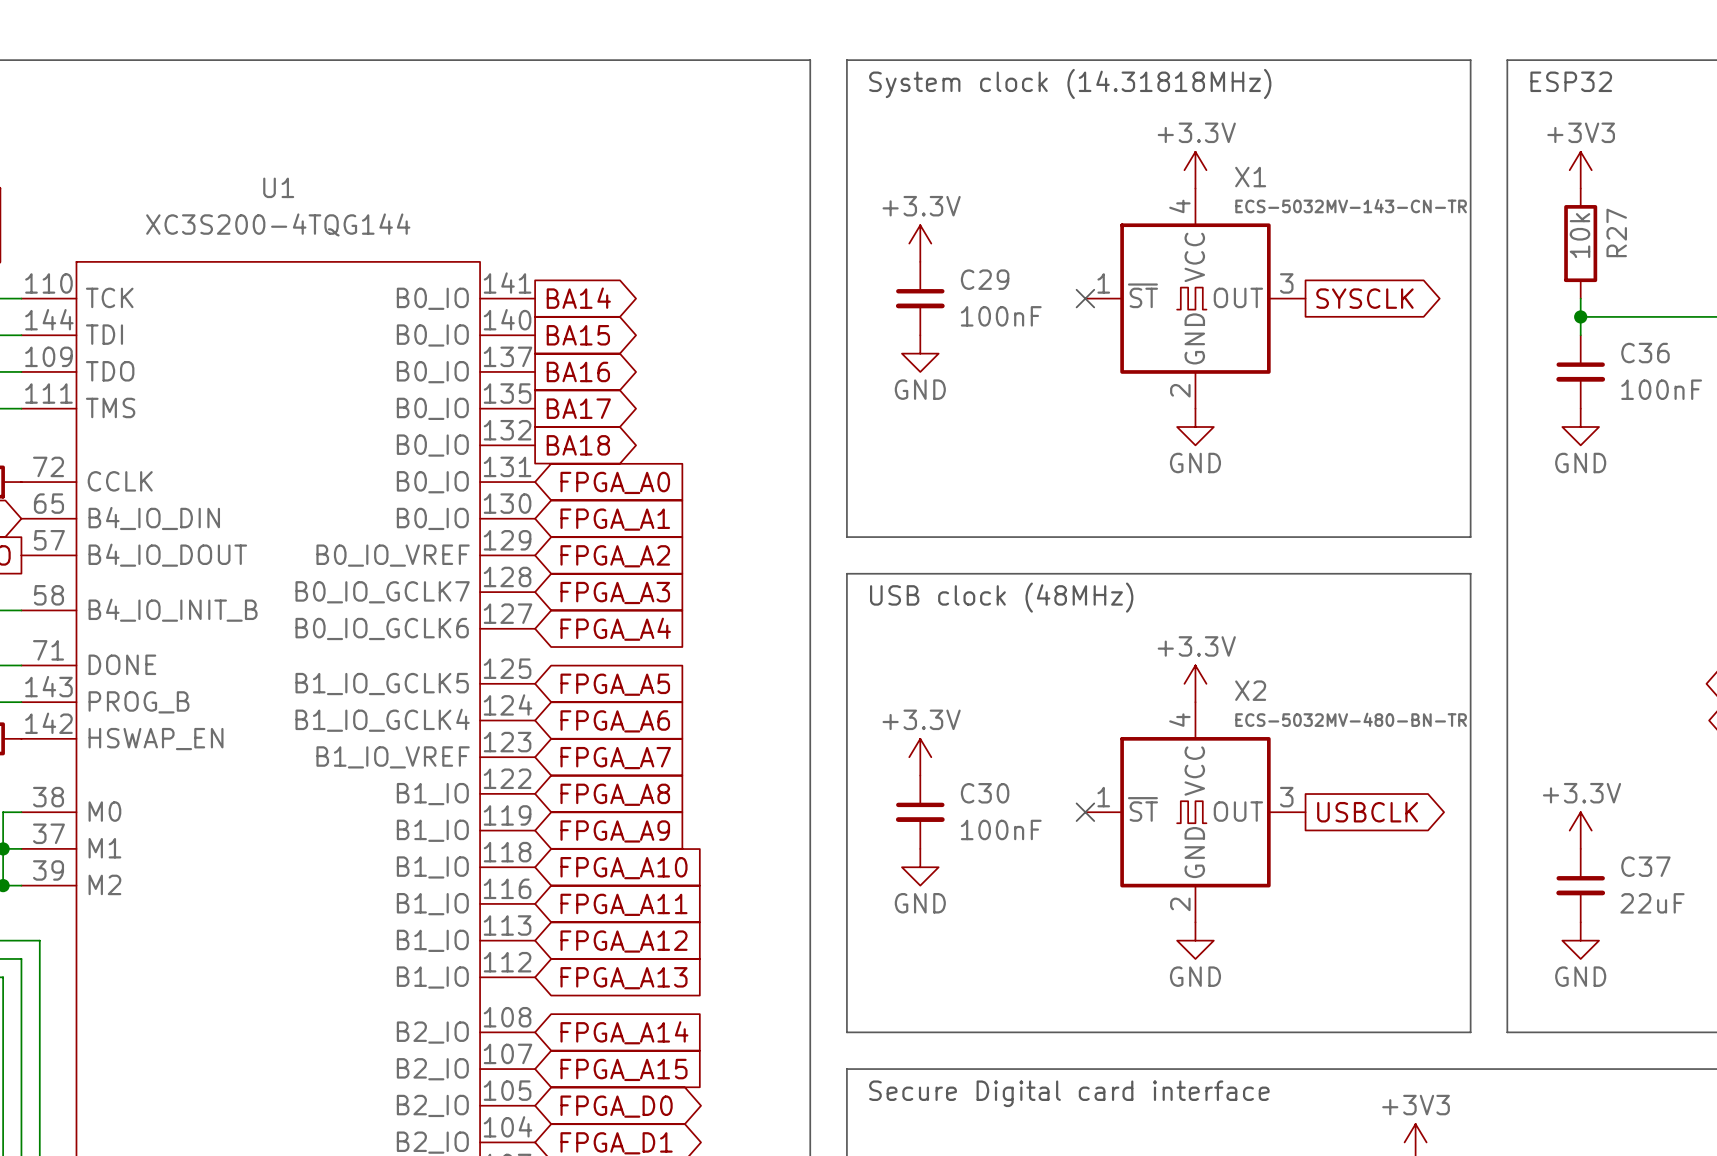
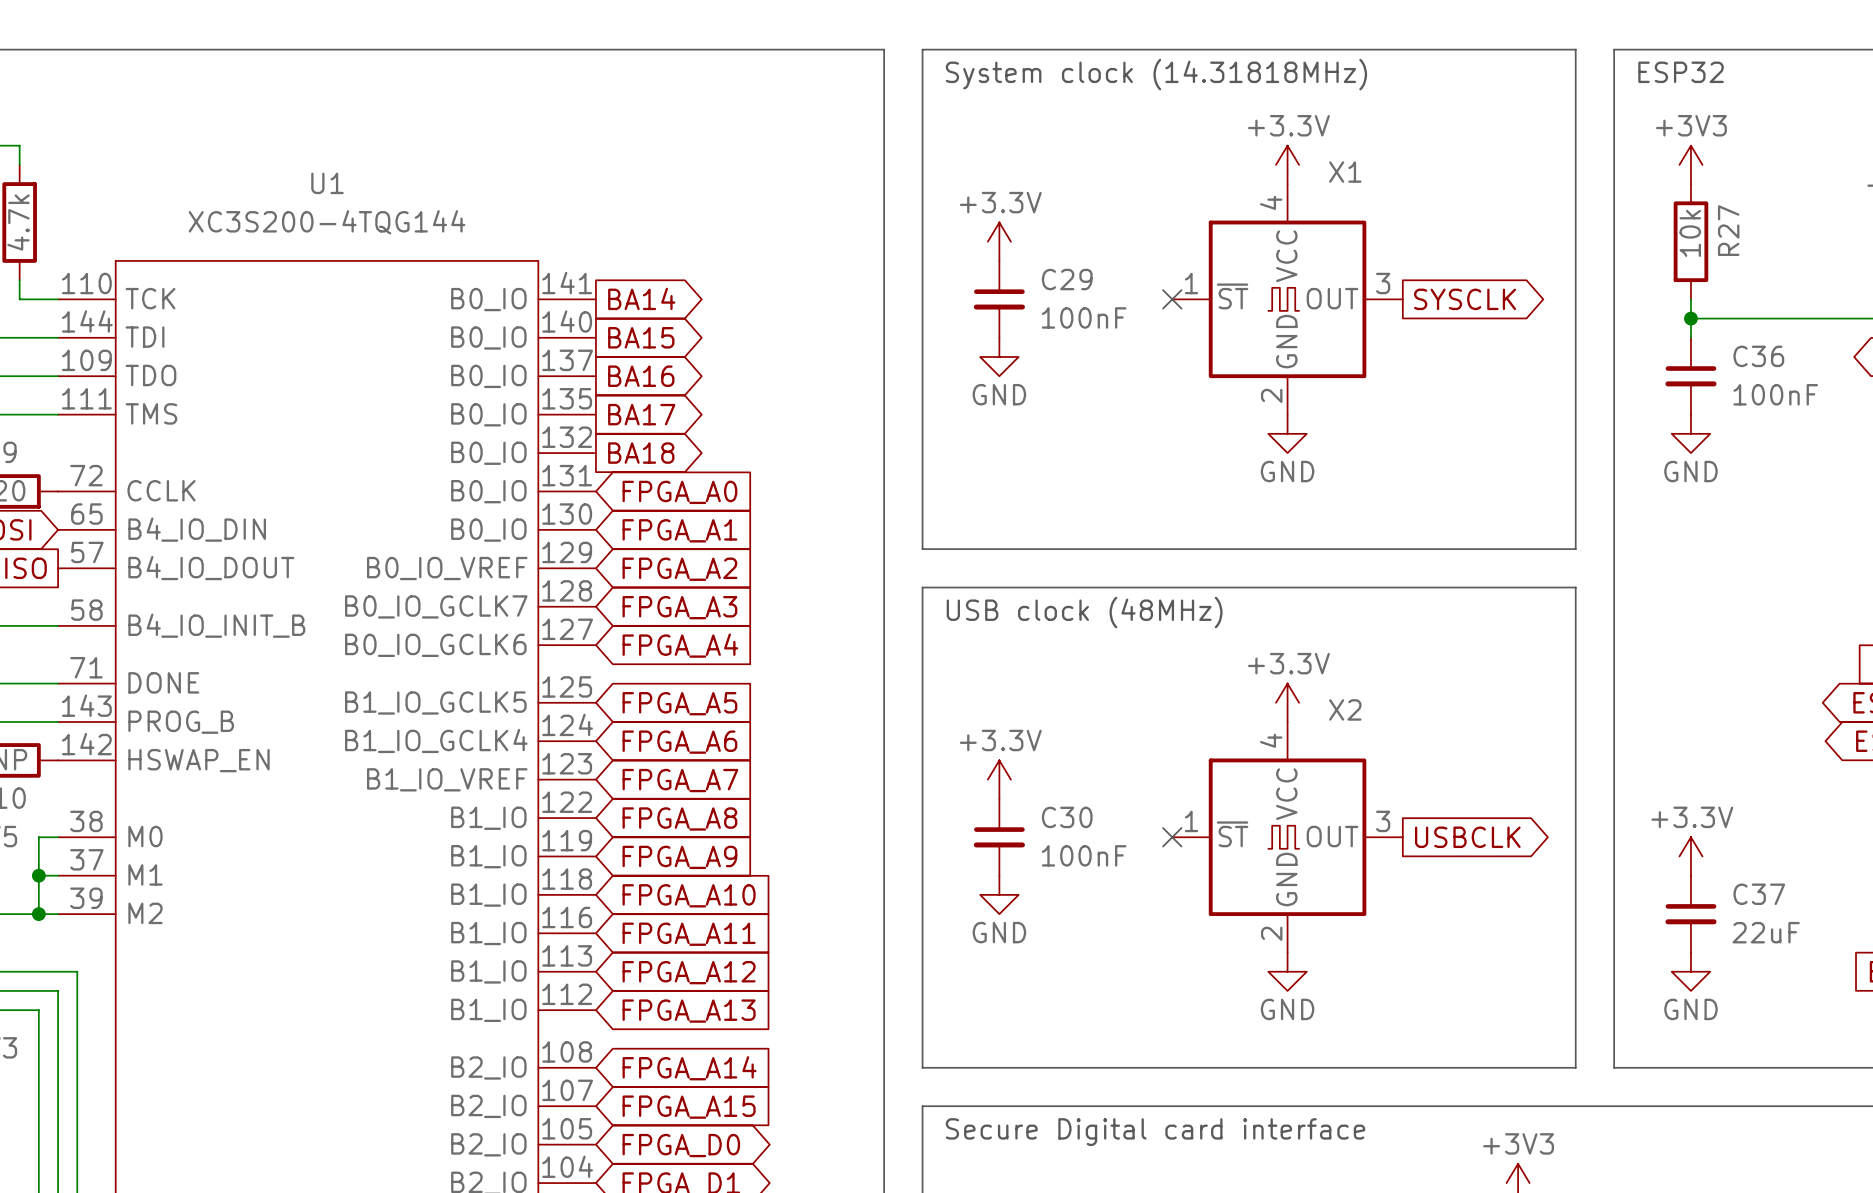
X1 value: ECS-5032MV-143-CN-TR (1351, 206) -> none
X2 value: ECS-5032MV-480-BN-TR (1351, 719) -> none

